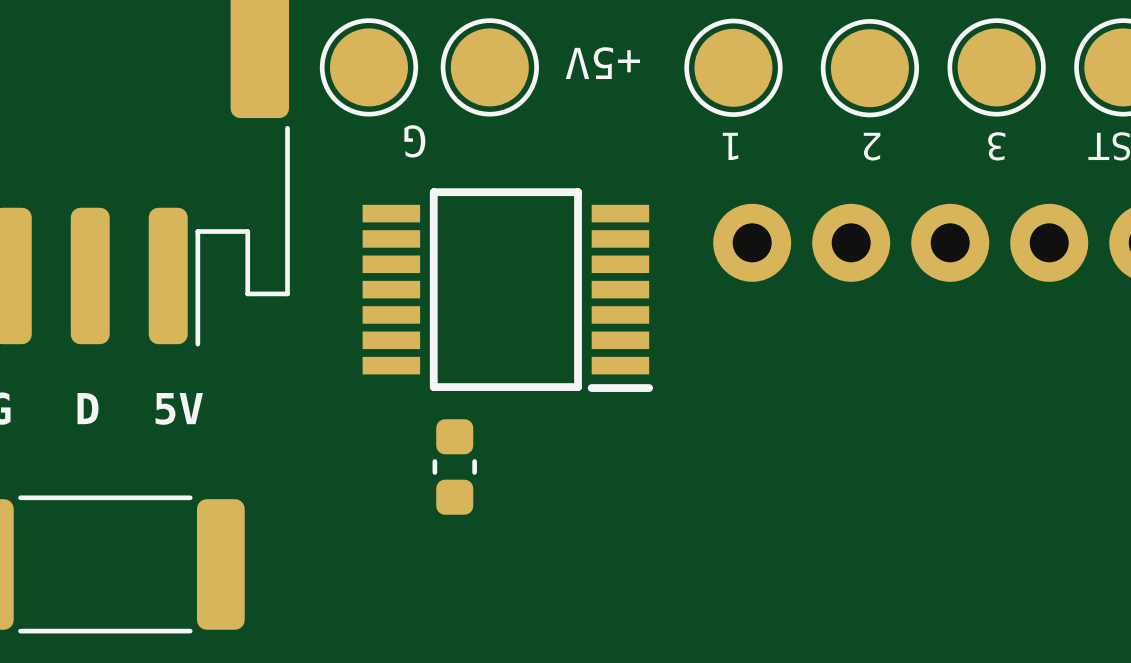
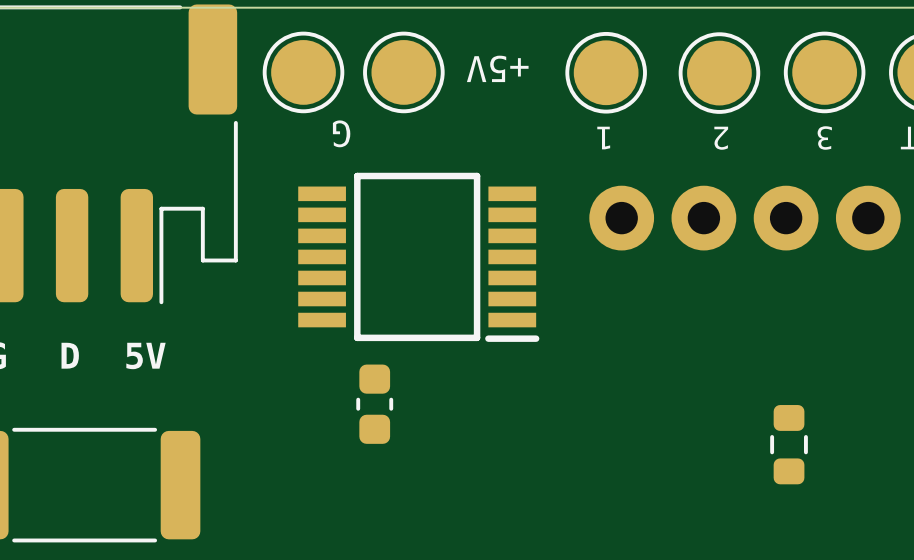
part: none -> (789, 444)

